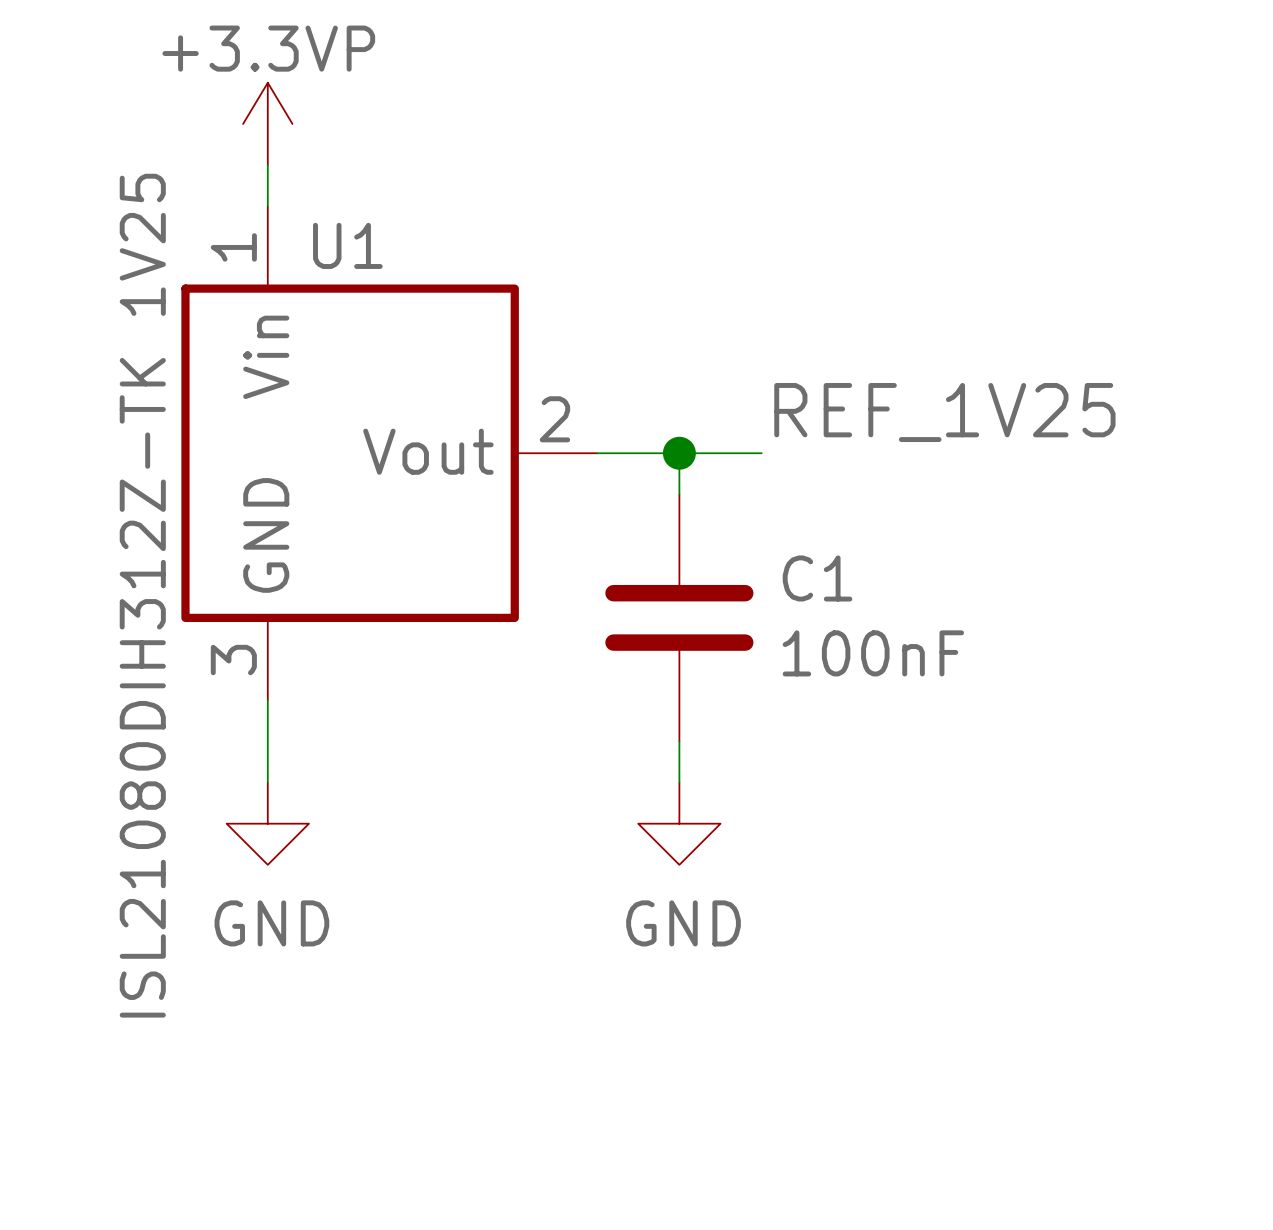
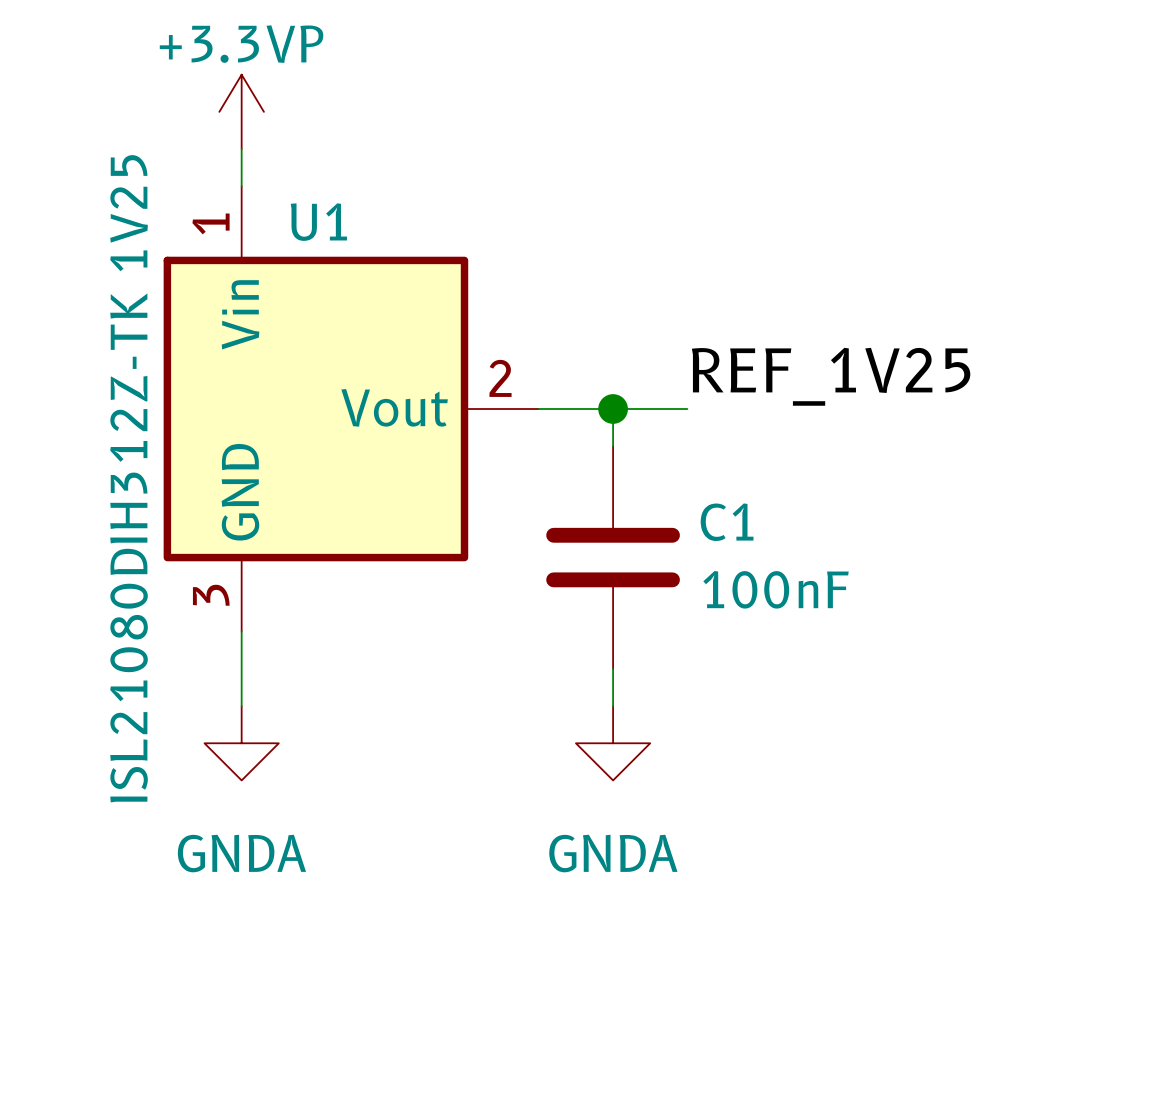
power symbol: GND (267, 823) -> GNDA (241, 743)
power symbol: GND (679, 823) -> GNDA (613, 743)

